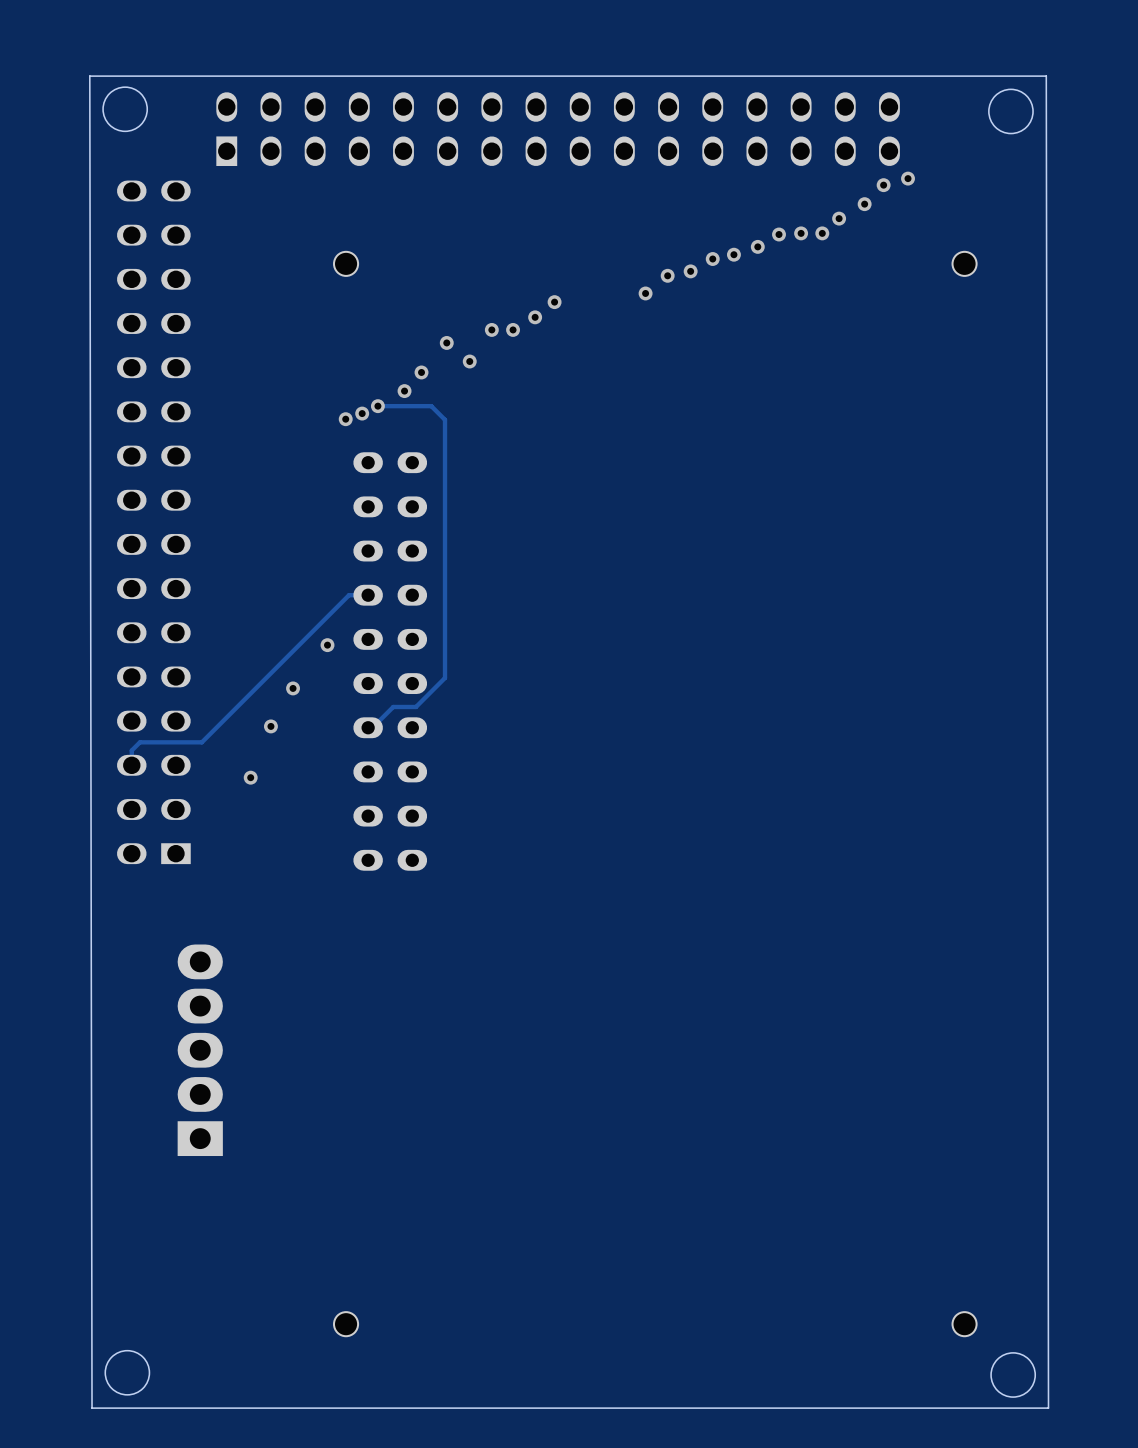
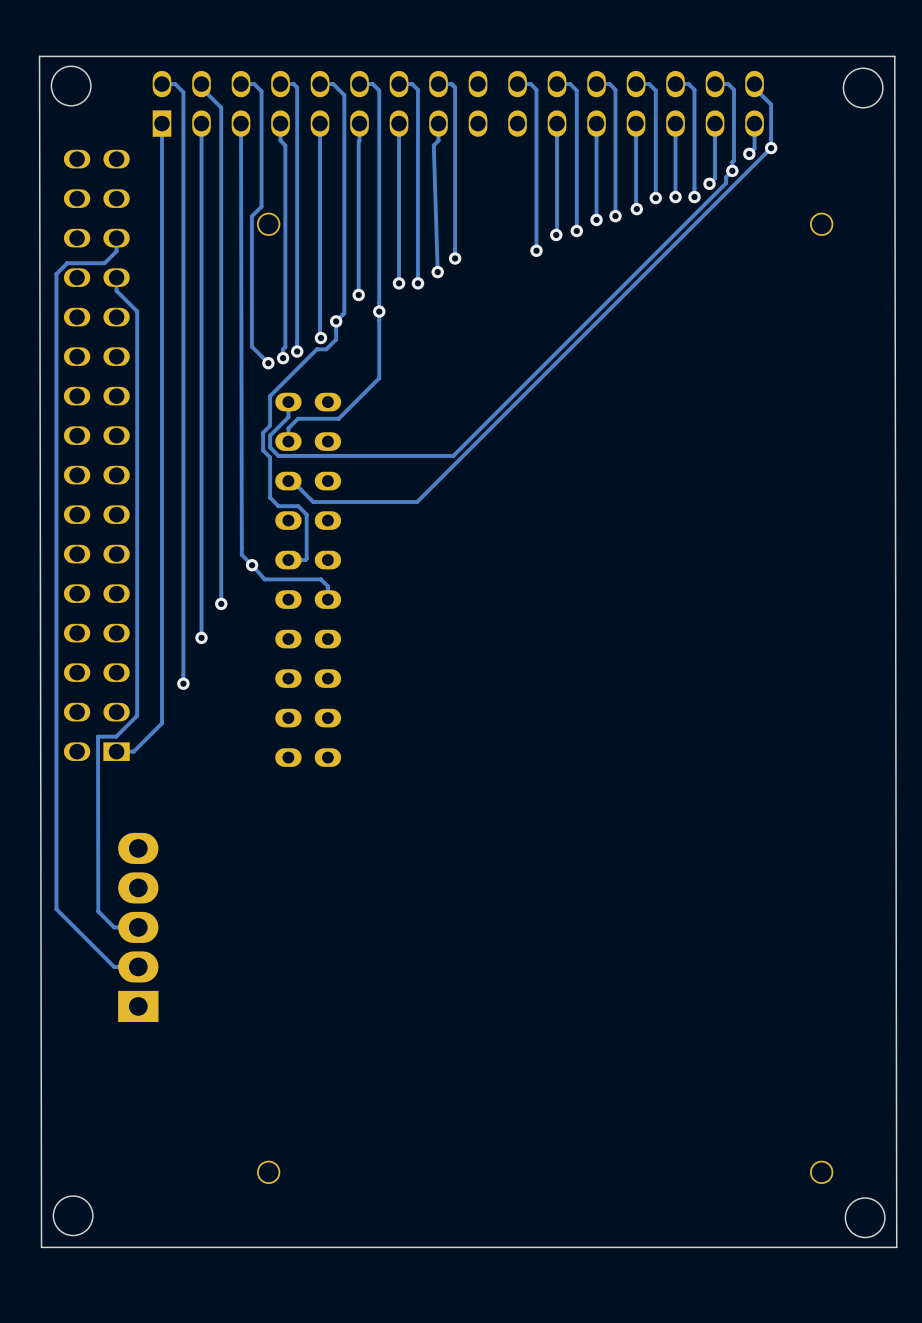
track: none -> (162, 84) (175, 84) (183, 92) (183, 683)
track: none -> (201, 84) (201, 87) (221, 107) (221, 603)
track: none -> (241, 84) (254, 84) (261, 91) (261, 206) (251, 216) (251, 346) (268, 363)
track: none -> (320, 84) (333, 84) (344, 95) (344, 313) (336, 321) (336, 339) (326, 349) (316, 349) (270, 396) (270, 425) (263, 432) (263, 450) (270, 457) (270, 497) (278, 506) (298, 506) (306, 514) (306, 558) (288, 560)
track: none -> (359, 84) (372, 84) (379, 90) (379, 378) (338, 418) (297, 418) (288, 428) (288, 441)
track: none -> (399, 84) (412, 84) (417, 89) (417, 283)
track: none -> (438, 84) (451, 84) (455, 87) (455, 258)
track: none -> (517, 84) (530, 84) (536, 89) (536, 250)
track: none -> (557, 84) (570, 84) (576, 90) (576, 231)
track: none -> (596, 84) (609, 84) (615, 89) (615, 216)
track: none -> (636, 84) (649, 84) (655, 90) (655, 198)
track: none -> (675, 84) (688, 84) (694, 89) (694, 197)
track: none -> (715, 84) (728, 84) (733, 89) (733, 160) (732, 170) (726, 177) (726, 183) (453, 455) (278, 455) (270, 447) (270, 435) (288, 417) (288, 402)
track: none -> (754, 84) (754, 87) (771, 104) (771, 148) (417, 501) (313, 501) (292, 481) (288, 481)
track: none -> (162, 123) (162, 723) (133, 751) (116, 751)
track: none -> (201, 123) (201, 637)
track: none -> (241, 123) (241, 554) (264, 579) (320, 579) (327, 586) (327, 599) (324, 599)
track: none -> (280, 123) (280, 140) (285, 145) (285, 347) (283, 349) (283, 358)
track: none -> (320, 123) (320, 338)
track: none -> (359, 123) (358, 295)
track: none -> (399, 123) (399, 283)
track: none -> (438, 123) (438, 140) (433, 145) (437, 272)
track: none -> (557, 123) (556, 234)
track: none -> (596, 123) (596, 219)
track: none -> (636, 123) (636, 209)
track: none -> (675, 123) (674, 197)
track: none -> (715, 123) (715, 178) (709, 183)
track: none -> (754, 123) (754, 148) (749, 153)
track: none -> (116, 238) (116, 251) (104, 263) (67, 263) (56, 274) (56, 909) (114, 966) (138, 966)
track: none -> (116, 277) (116, 290) (137, 311) (137, 715) (116, 736) (98, 736) (98, 911) (114, 927) (138, 927)
track: (377, 406) (431, 406) (445, 419) (445, 677) (416, 706) (393, 706) (372, 727) (368, 727) -> (297, 351) (297, 87) (293, 84) (280, 84)
track: (368, 595) (349, 595) (201, 742) (139, 742) (131, 750) (131, 765) -> none

